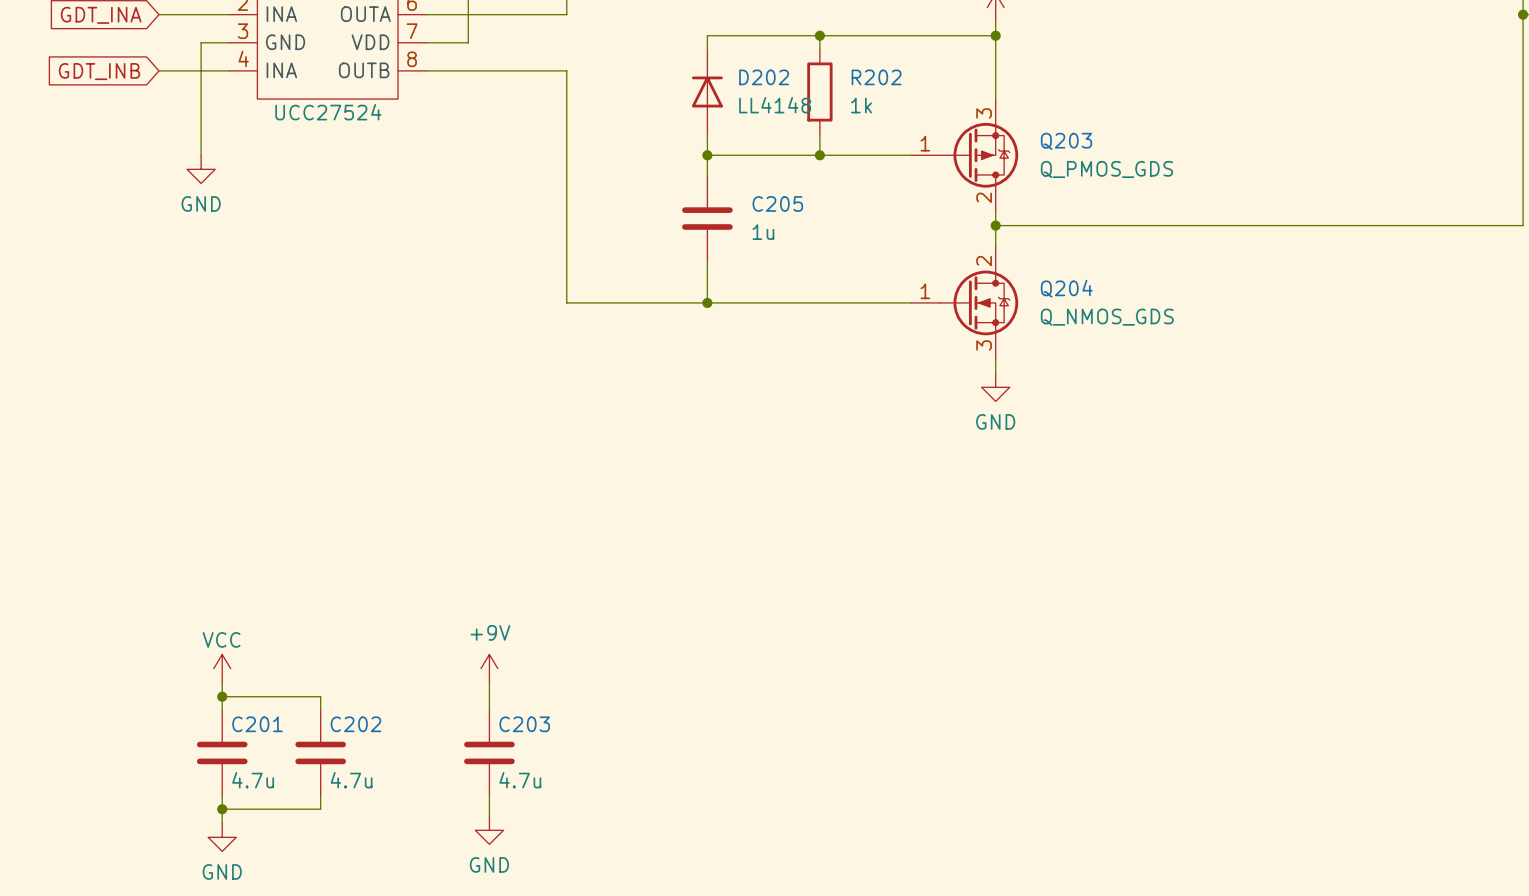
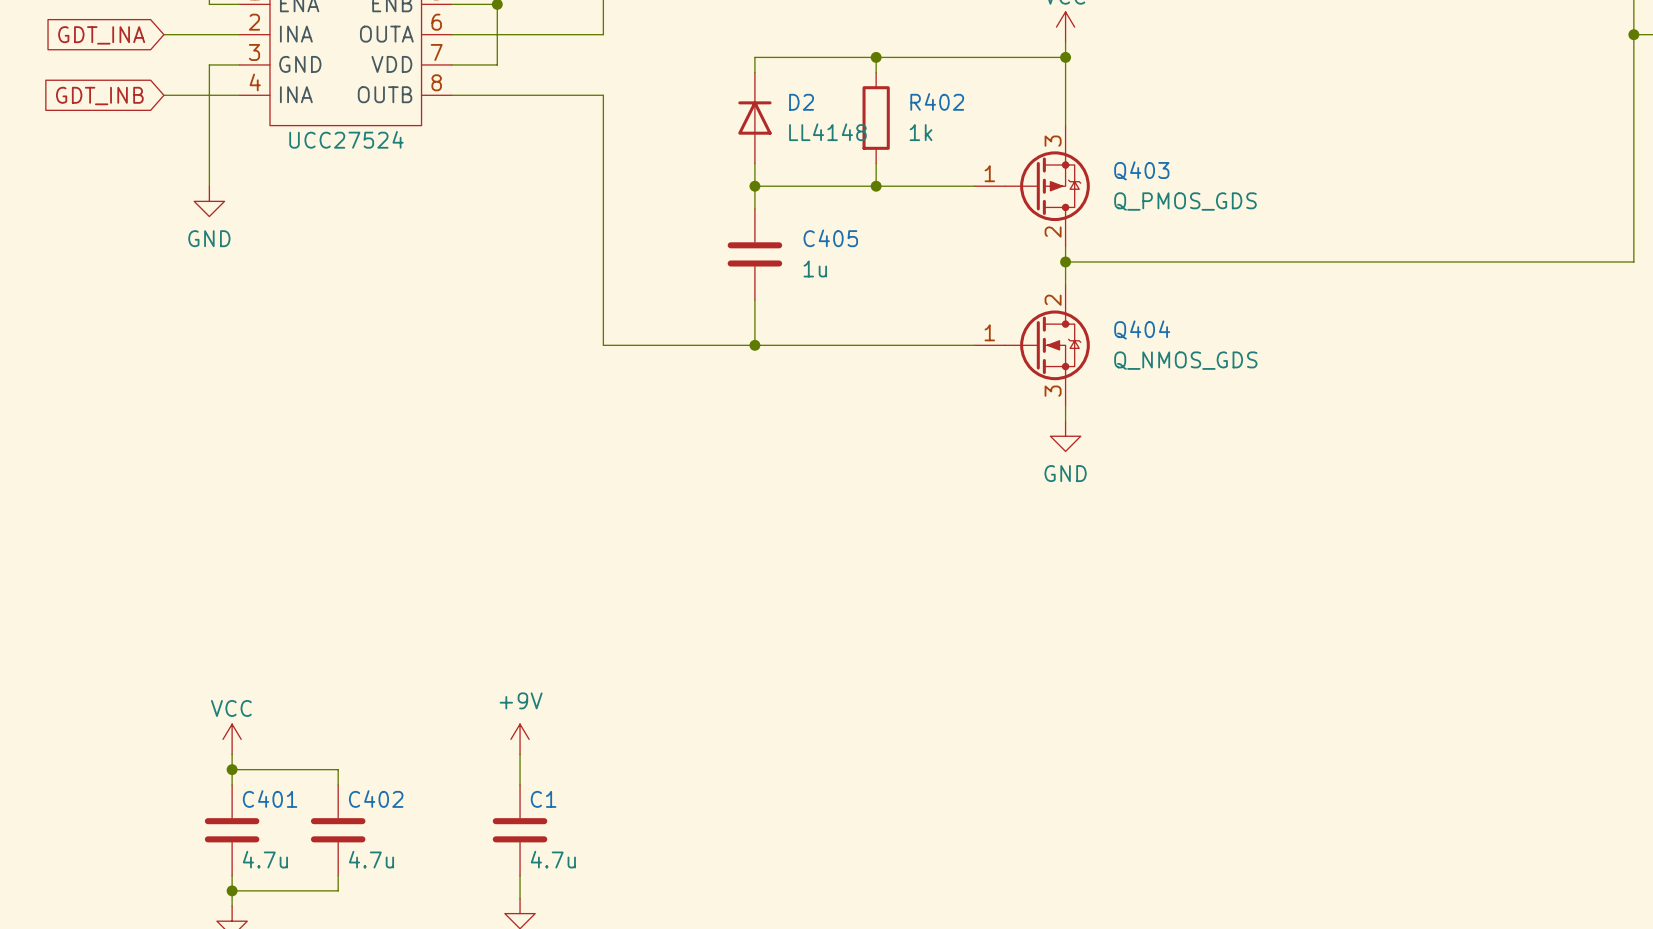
D202 name: D202 (764, 77) -> D2 (801, 102)
R202 name: R202 (876, 77) -> R402 (937, 101)
Q203 name: Q203 (1066, 141) -> Q403 (1141, 170)
C205 name: C205 (777, 203) -> C405 (830, 238)
Q204 name: Q204 (1066, 288) -> Q404 (1142, 329)
C201 name: C201 (257, 724) -> C401 (270, 799)
C202 name: C202 (355, 724) -> C402 (376, 799)
C203 name: C203 (524, 724) -> C1 (543, 799)

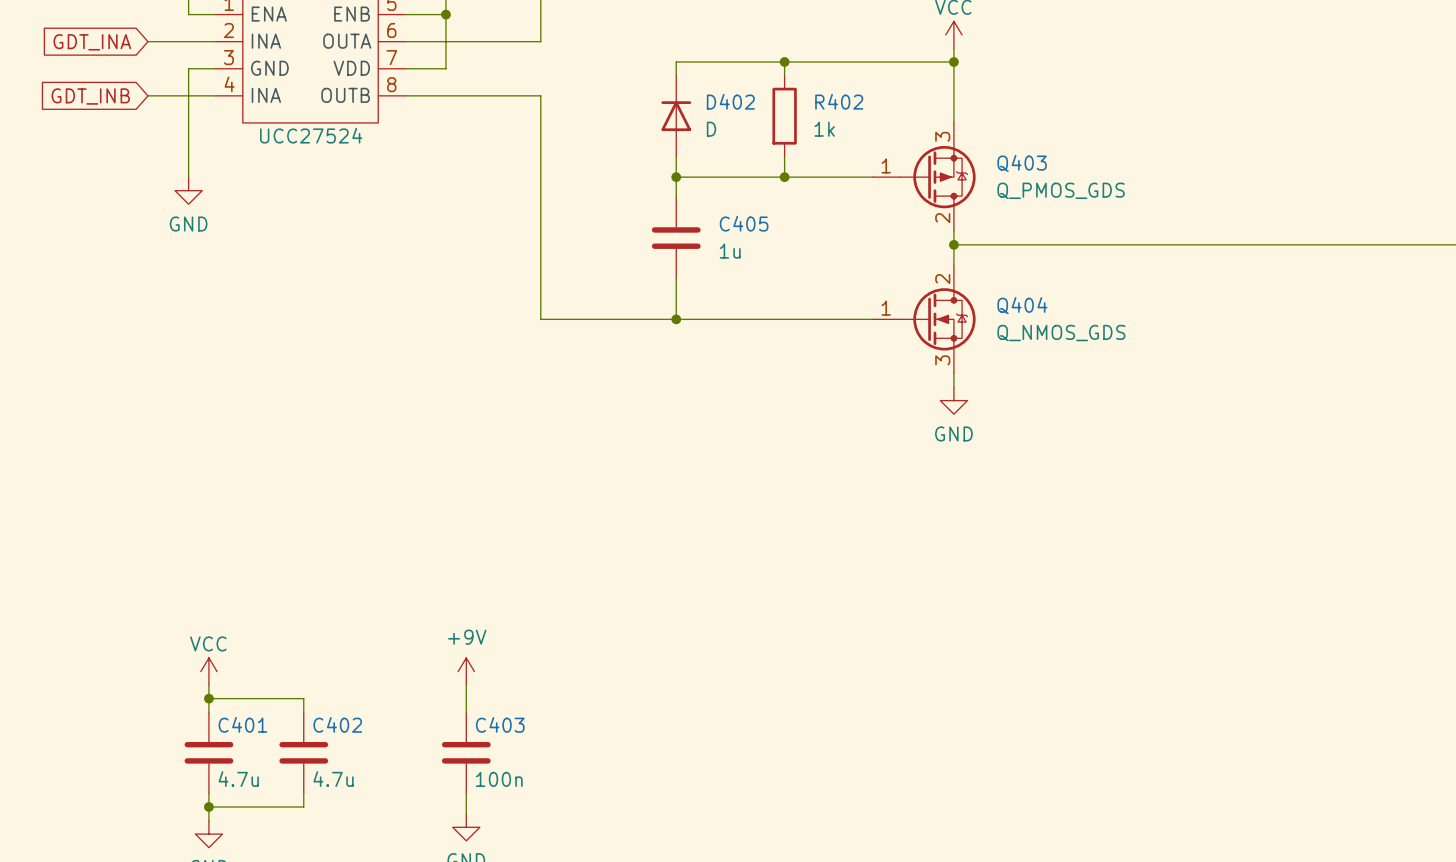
D2 name: D2 (801, 102) -> D402 (730, 101)
D2 value: LL4148 (827, 132) -> D (711, 129)
C1 name: C1 (543, 799) -> C403 (500, 724)
C1 value: 4.7u (553, 859) -> 100n (499, 779)

